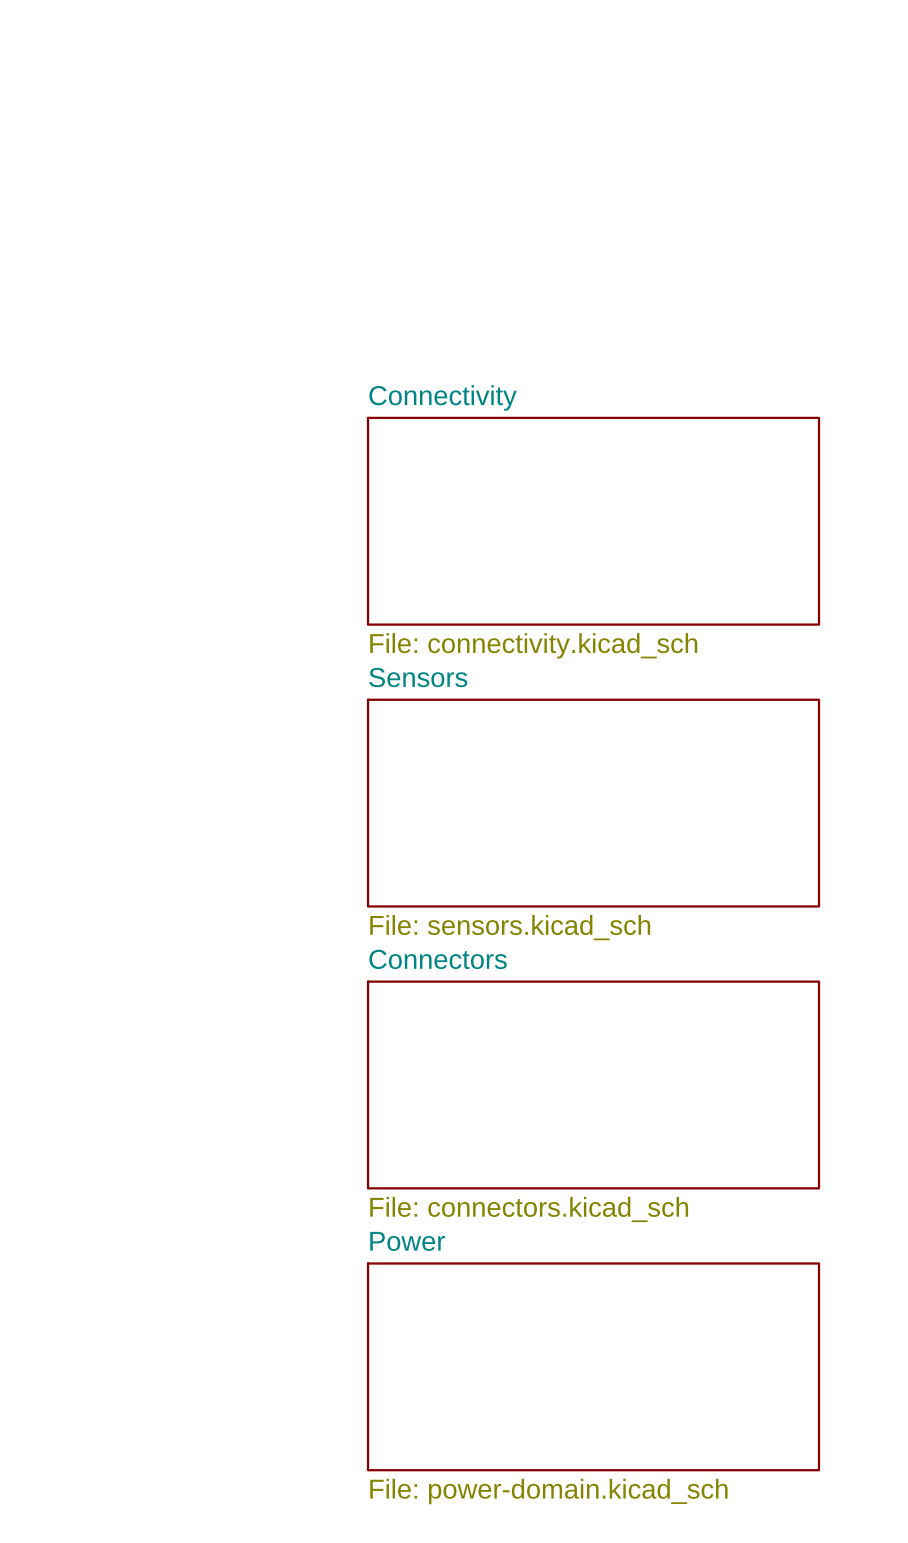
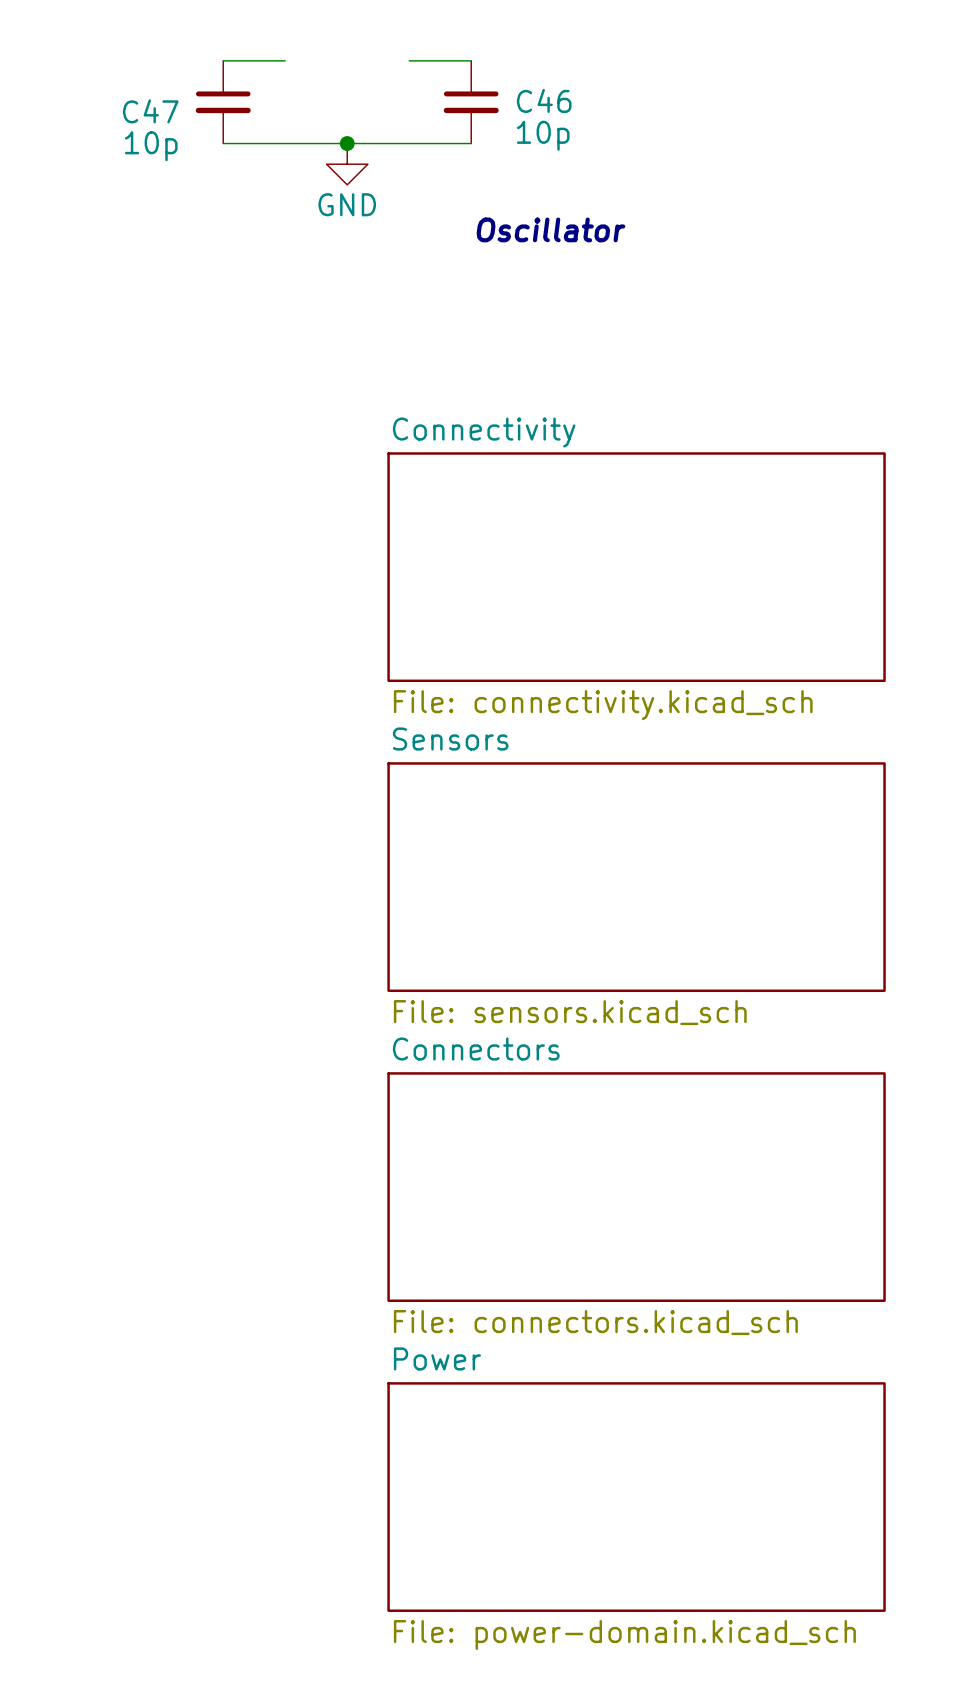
wire: none -> (223, 60) (285, 60)
wire: none -> (409, 60) (471, 60)
C47: none -> 10p (223, 102)
C46: none -> 10p (471, 102)
wire: none -> (223, 143) (471, 143)
junction: none -> (347, 143)
power symbol: none -> GND (347, 164)
text: none -> Oscillator (551, 229)

